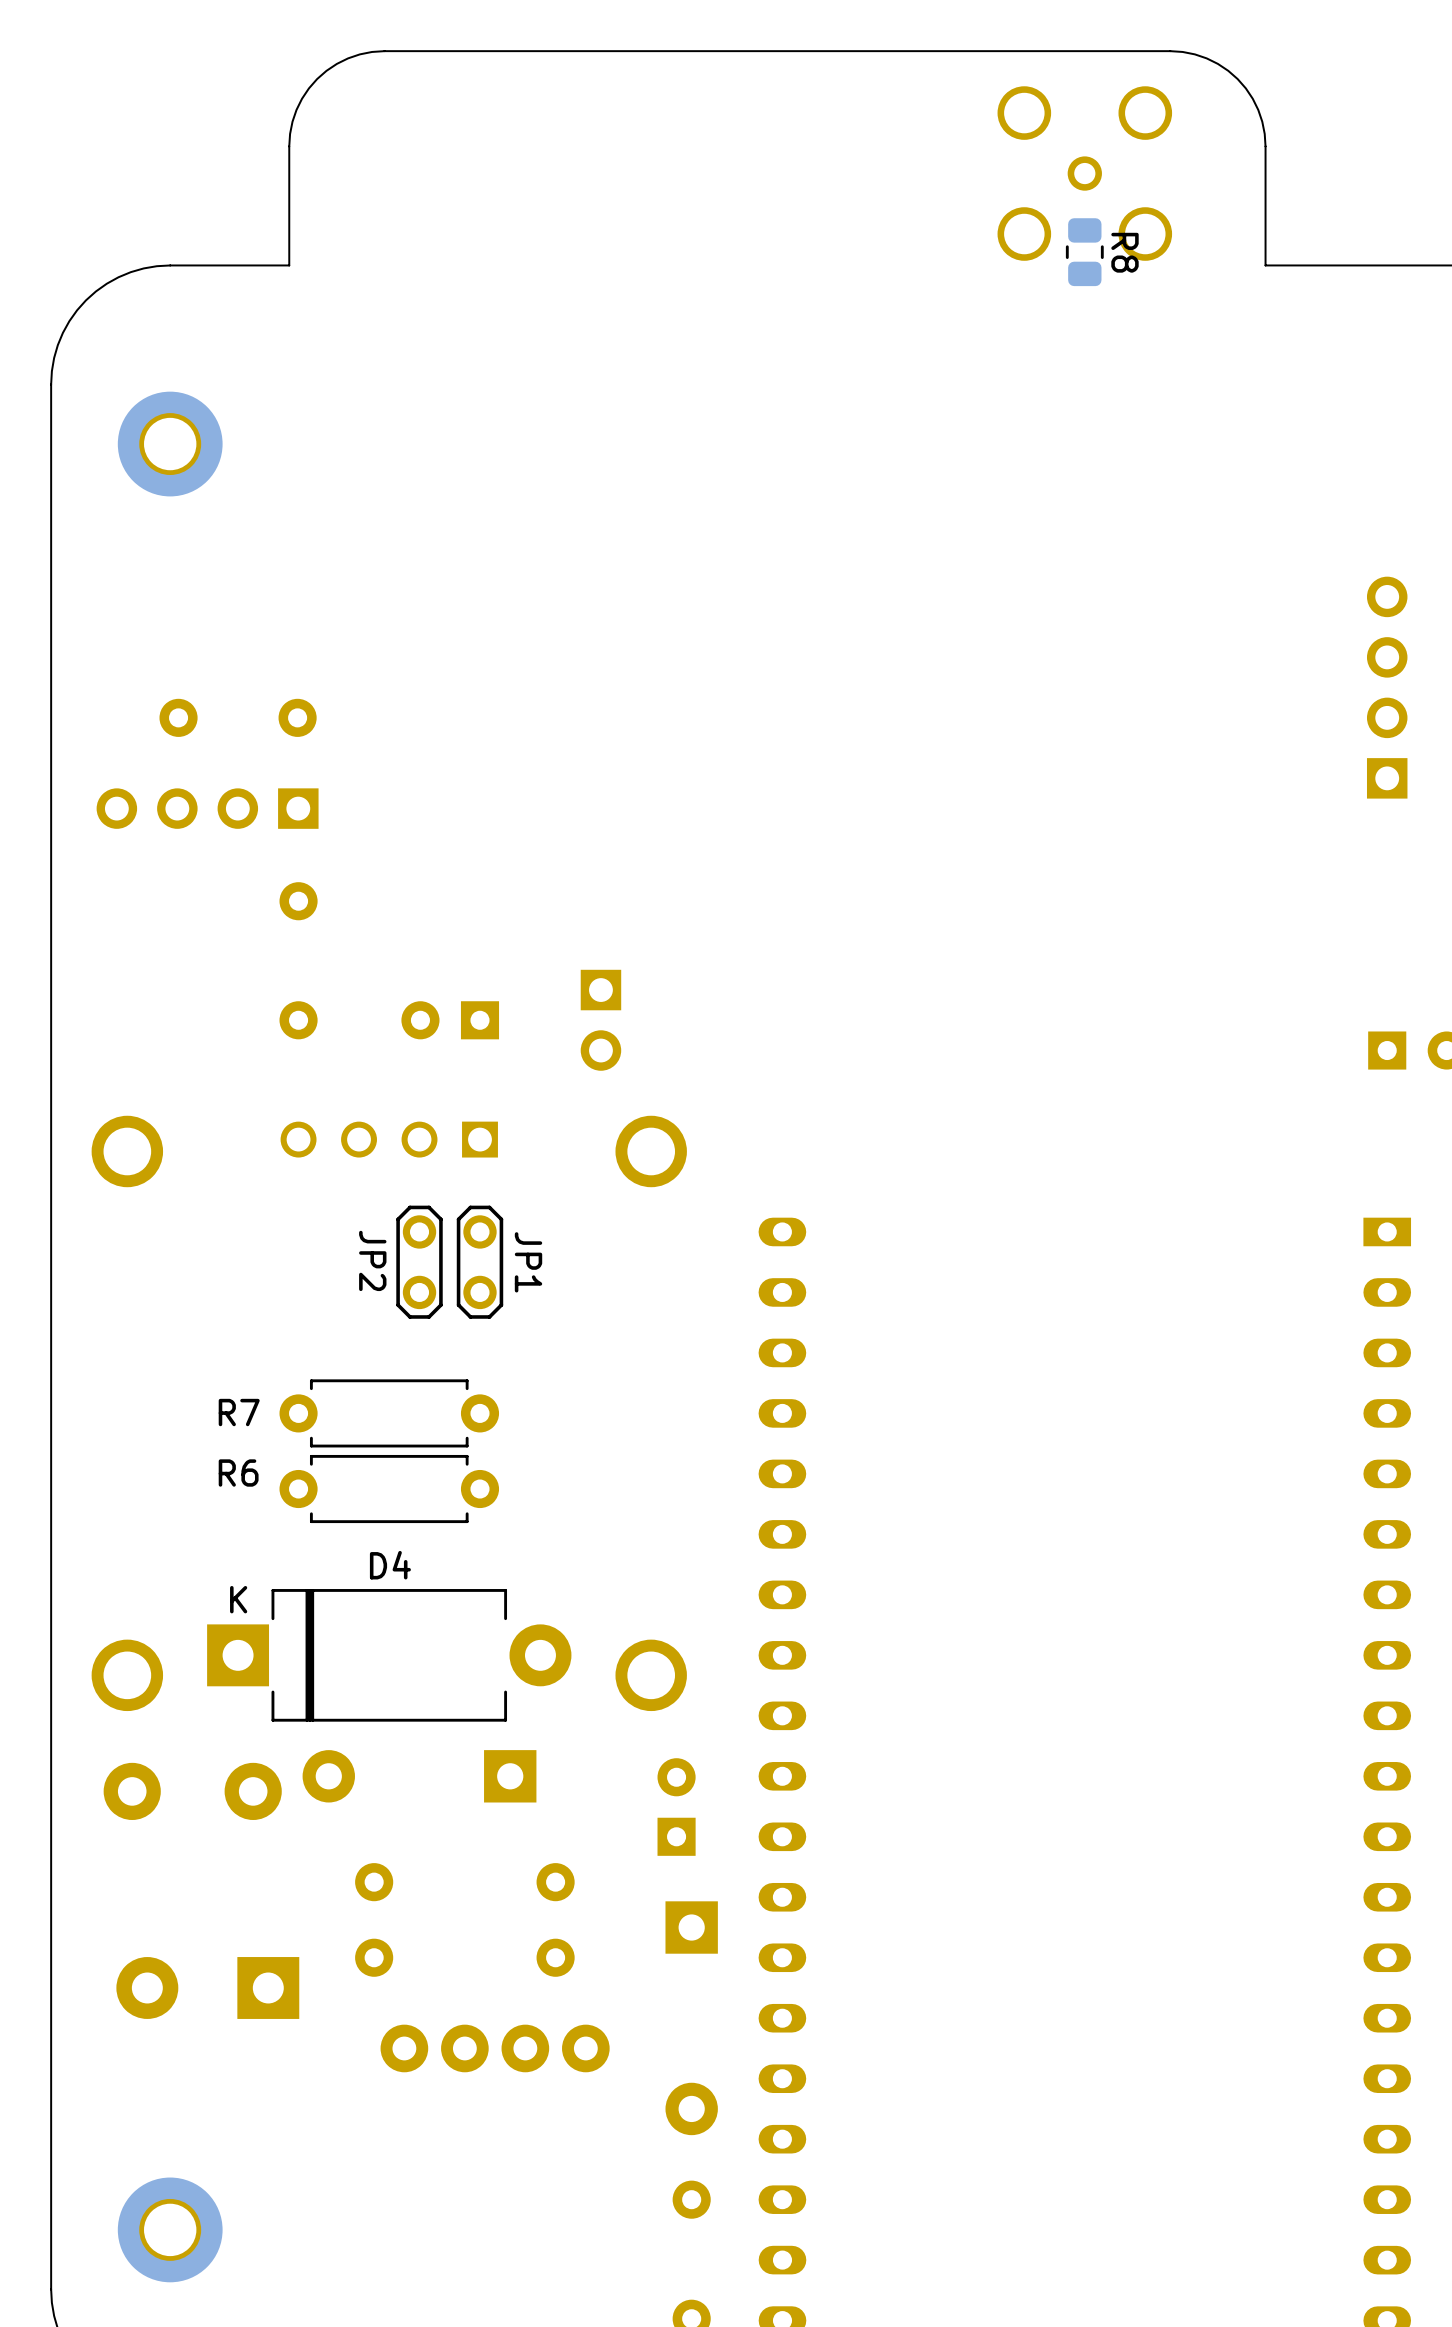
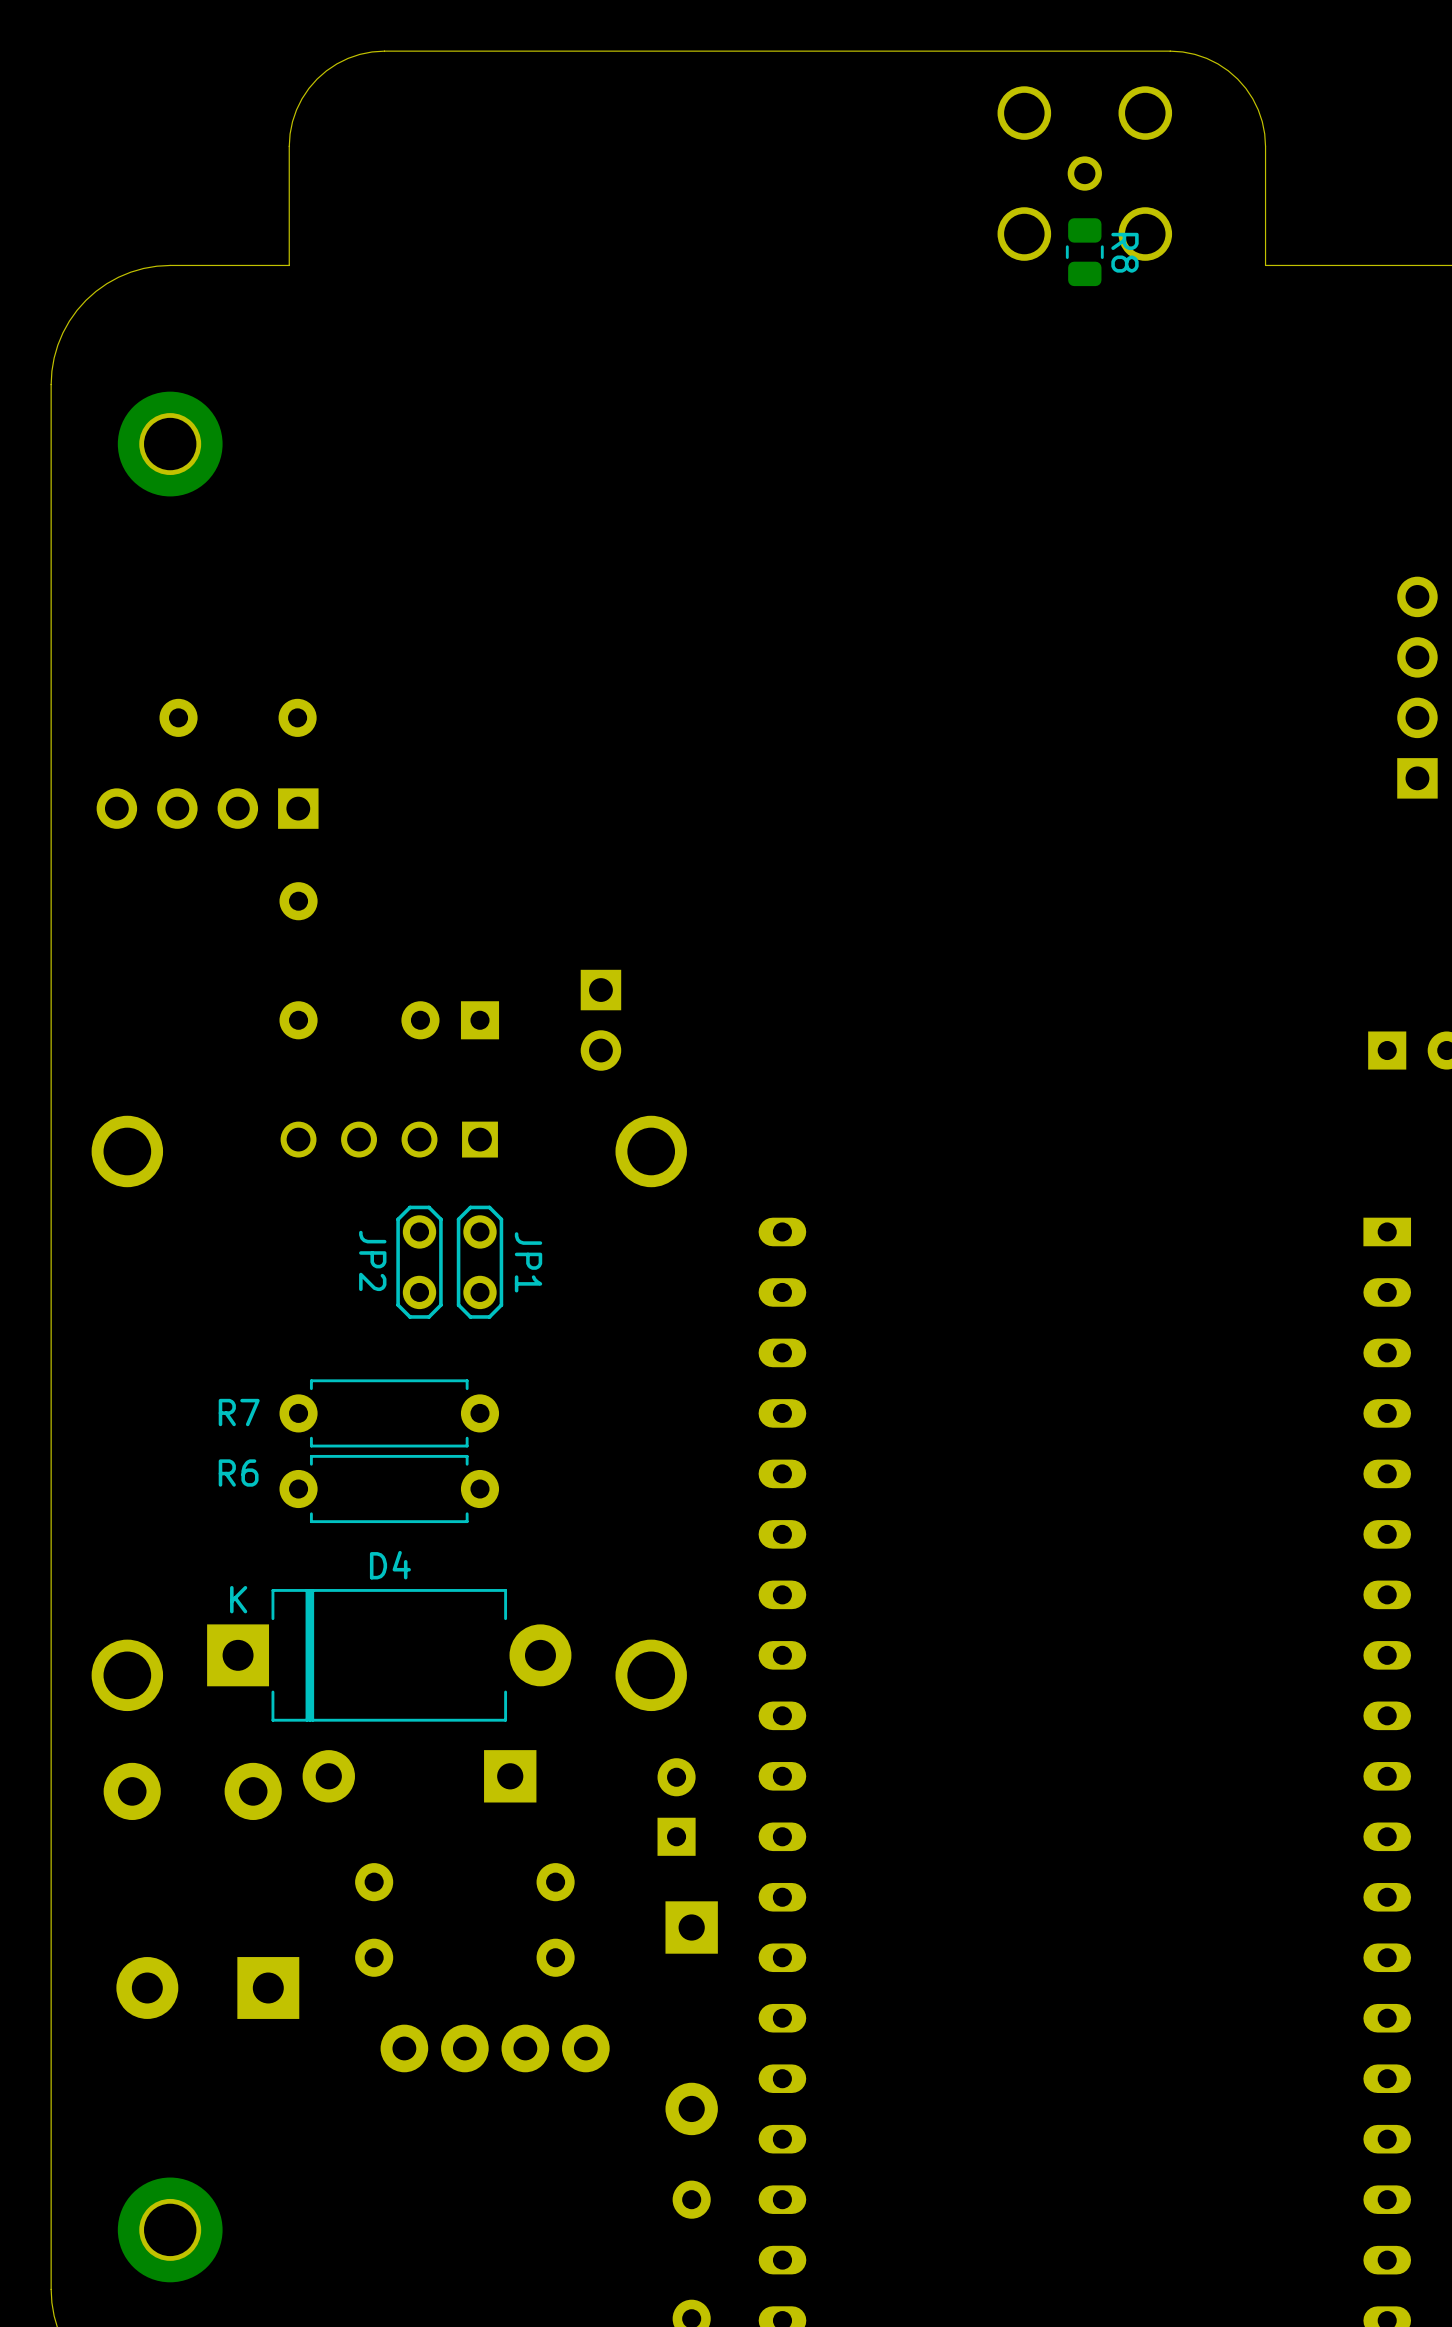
part position: (1387, 687) -> (1417, 687)

